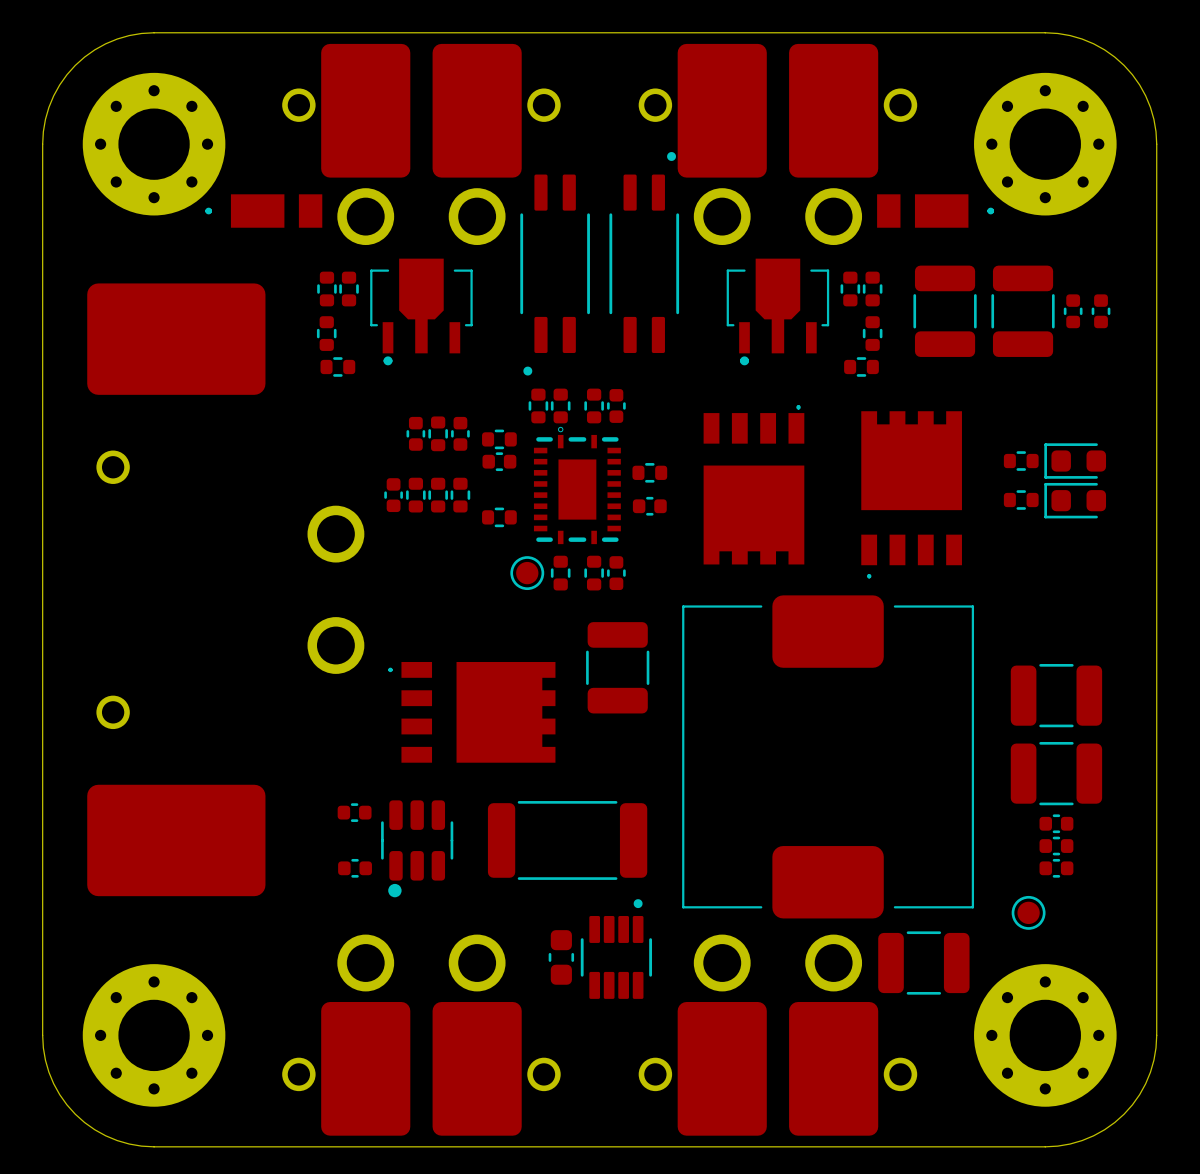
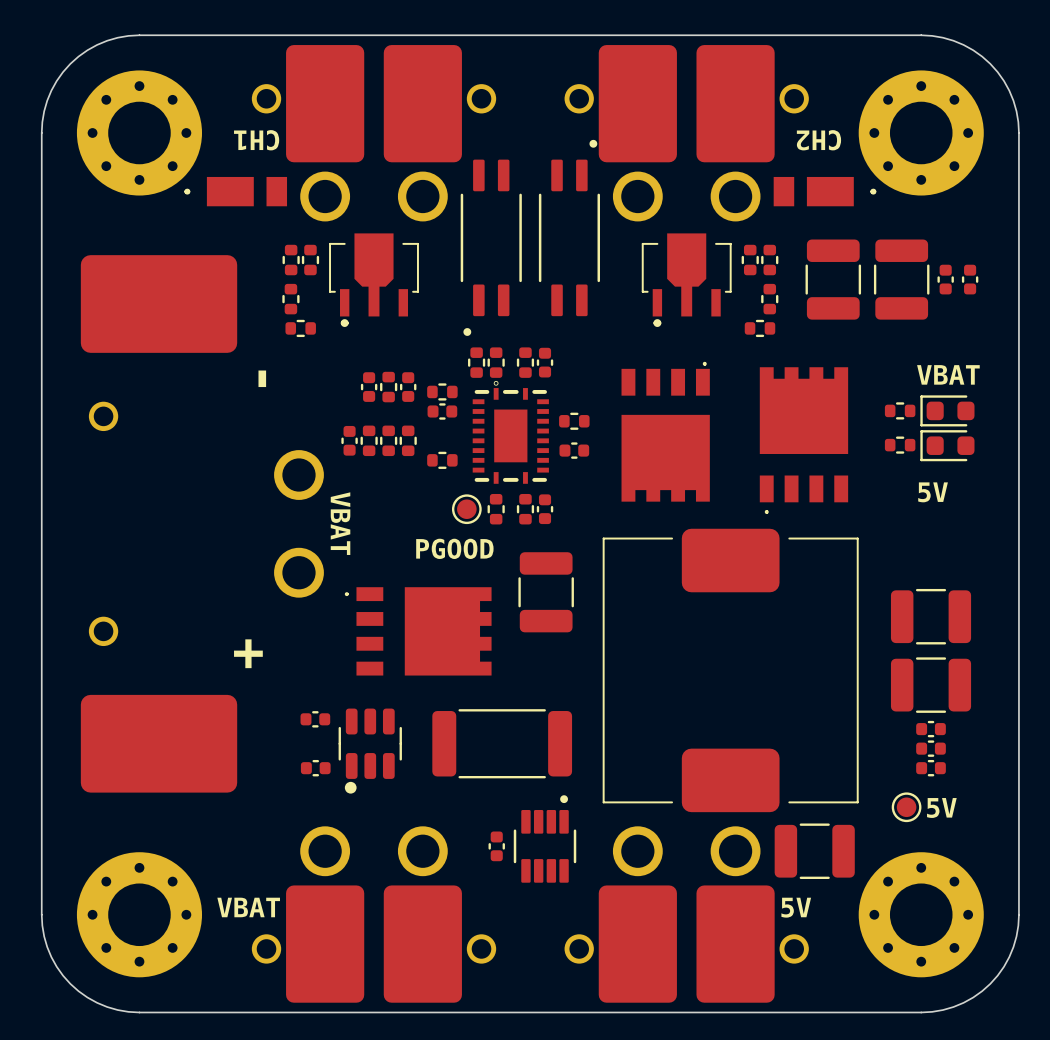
text: none -> CH1 (256, 140)
text: none -> CH2 (818, 140)
text: none -> - (262, 378)
text: none -> VBAT (948, 374)
text: none -> 5V (933, 492)
text: none -> VBAT (340, 523)
text: none -> PGOOD (454, 548)
text: none -> + (248, 653)
text: none -> 5V (941, 807)
part footprint: [548, 930, 575, 985] -> [488, 831, 505, 862]
text: none -> VBAT (248, 907)
text: none -> 5V (796, 907)

